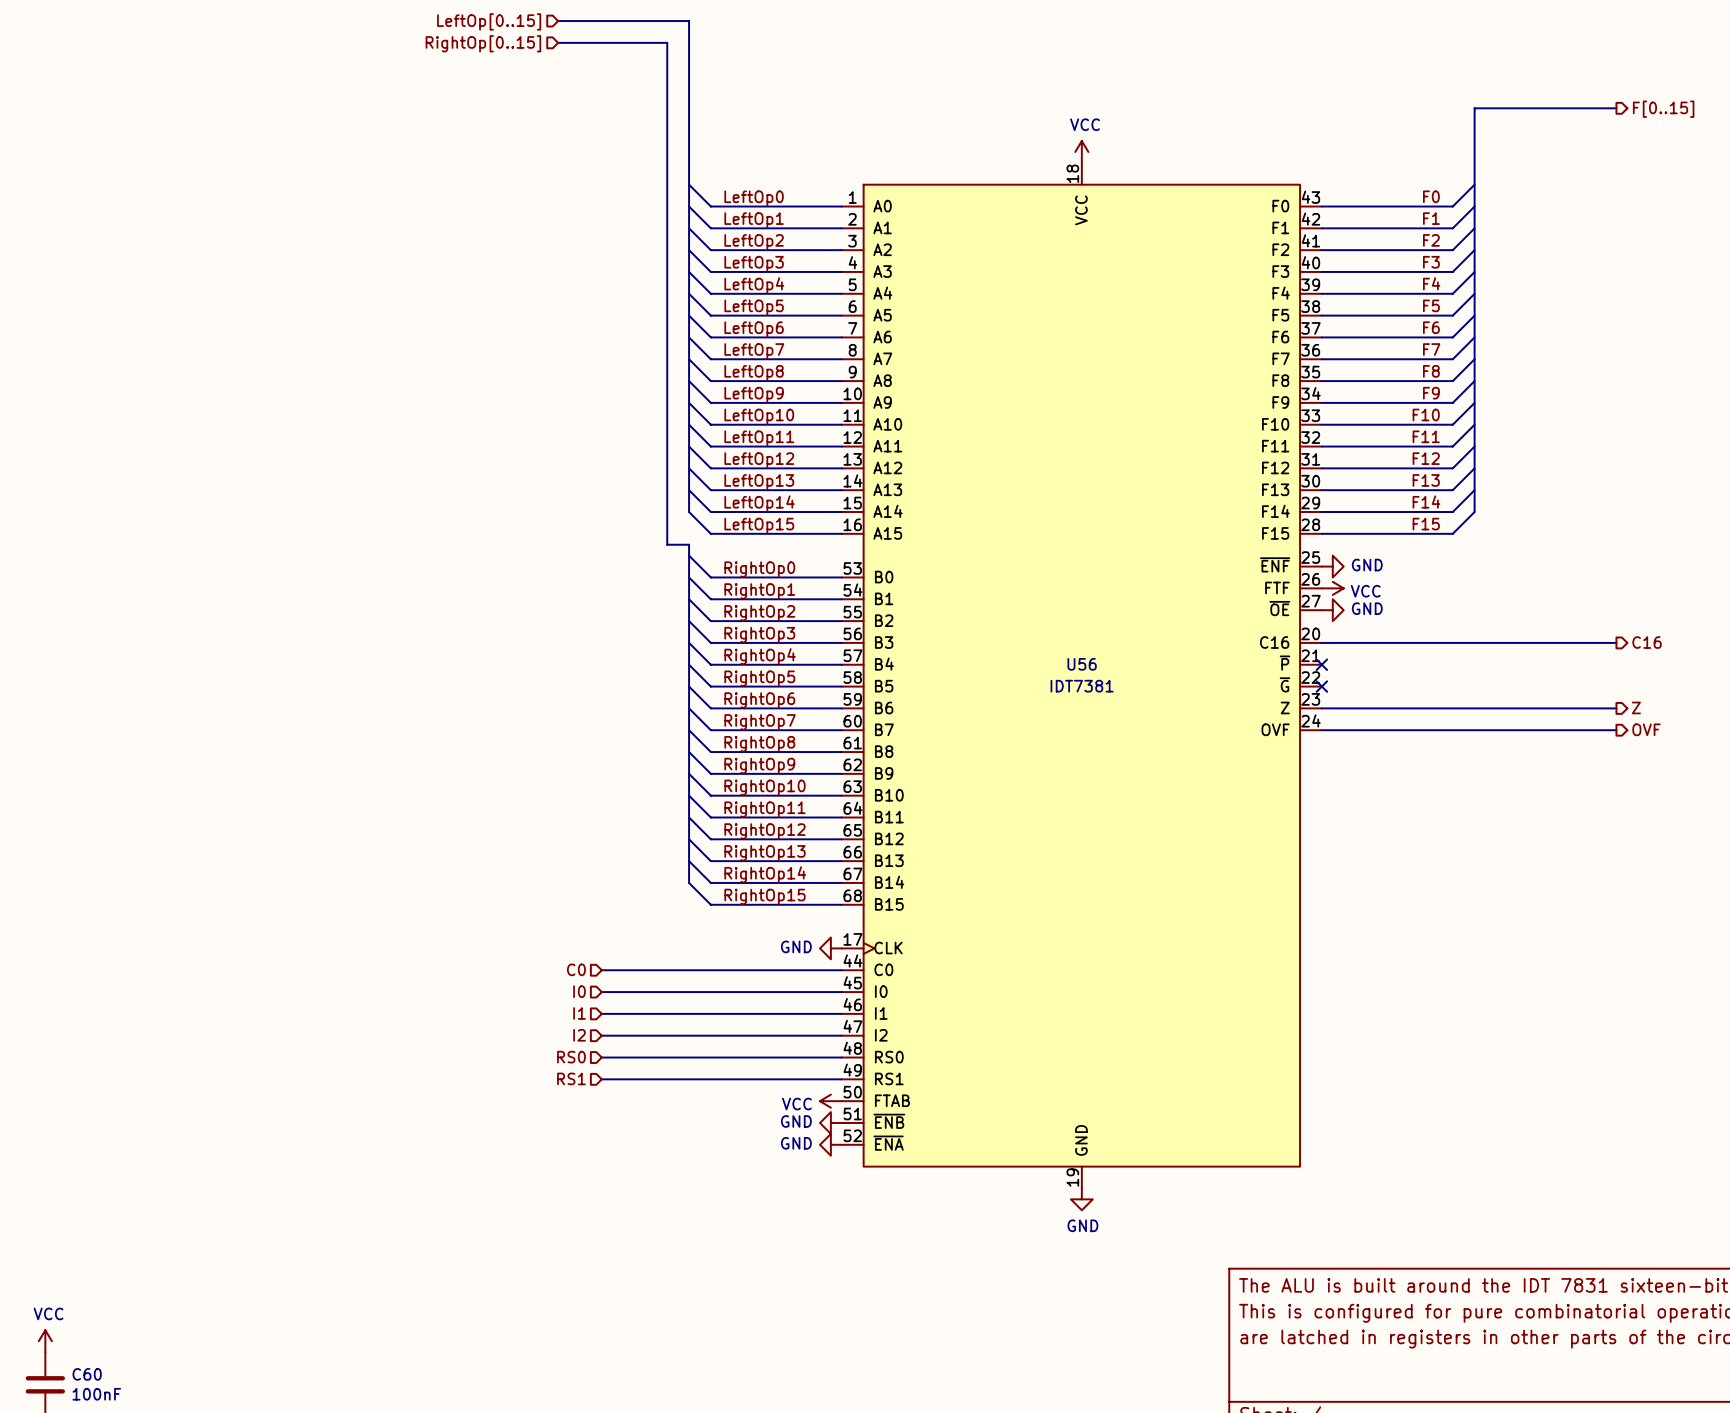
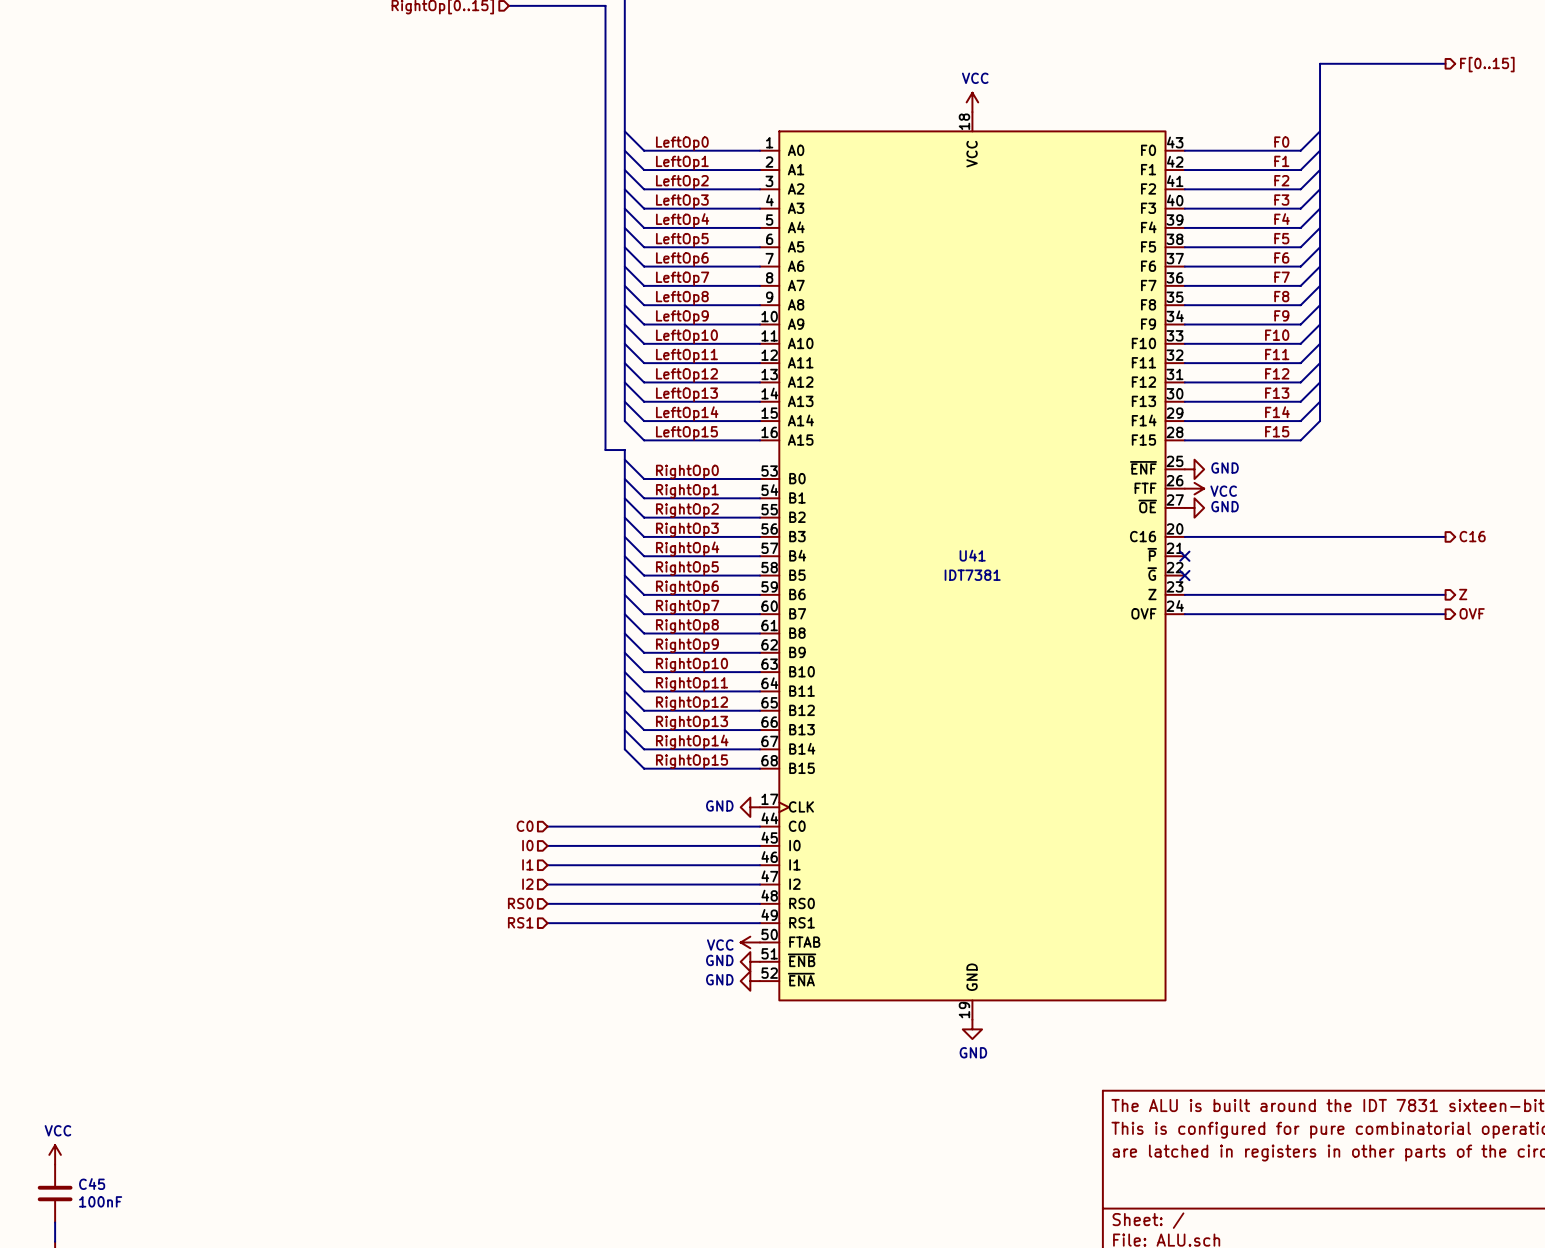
U56 name: U56 (1082, 664) -> U41 (972, 555)
C60 name: C60 (87, 1374) -> C45 (92, 1184)

